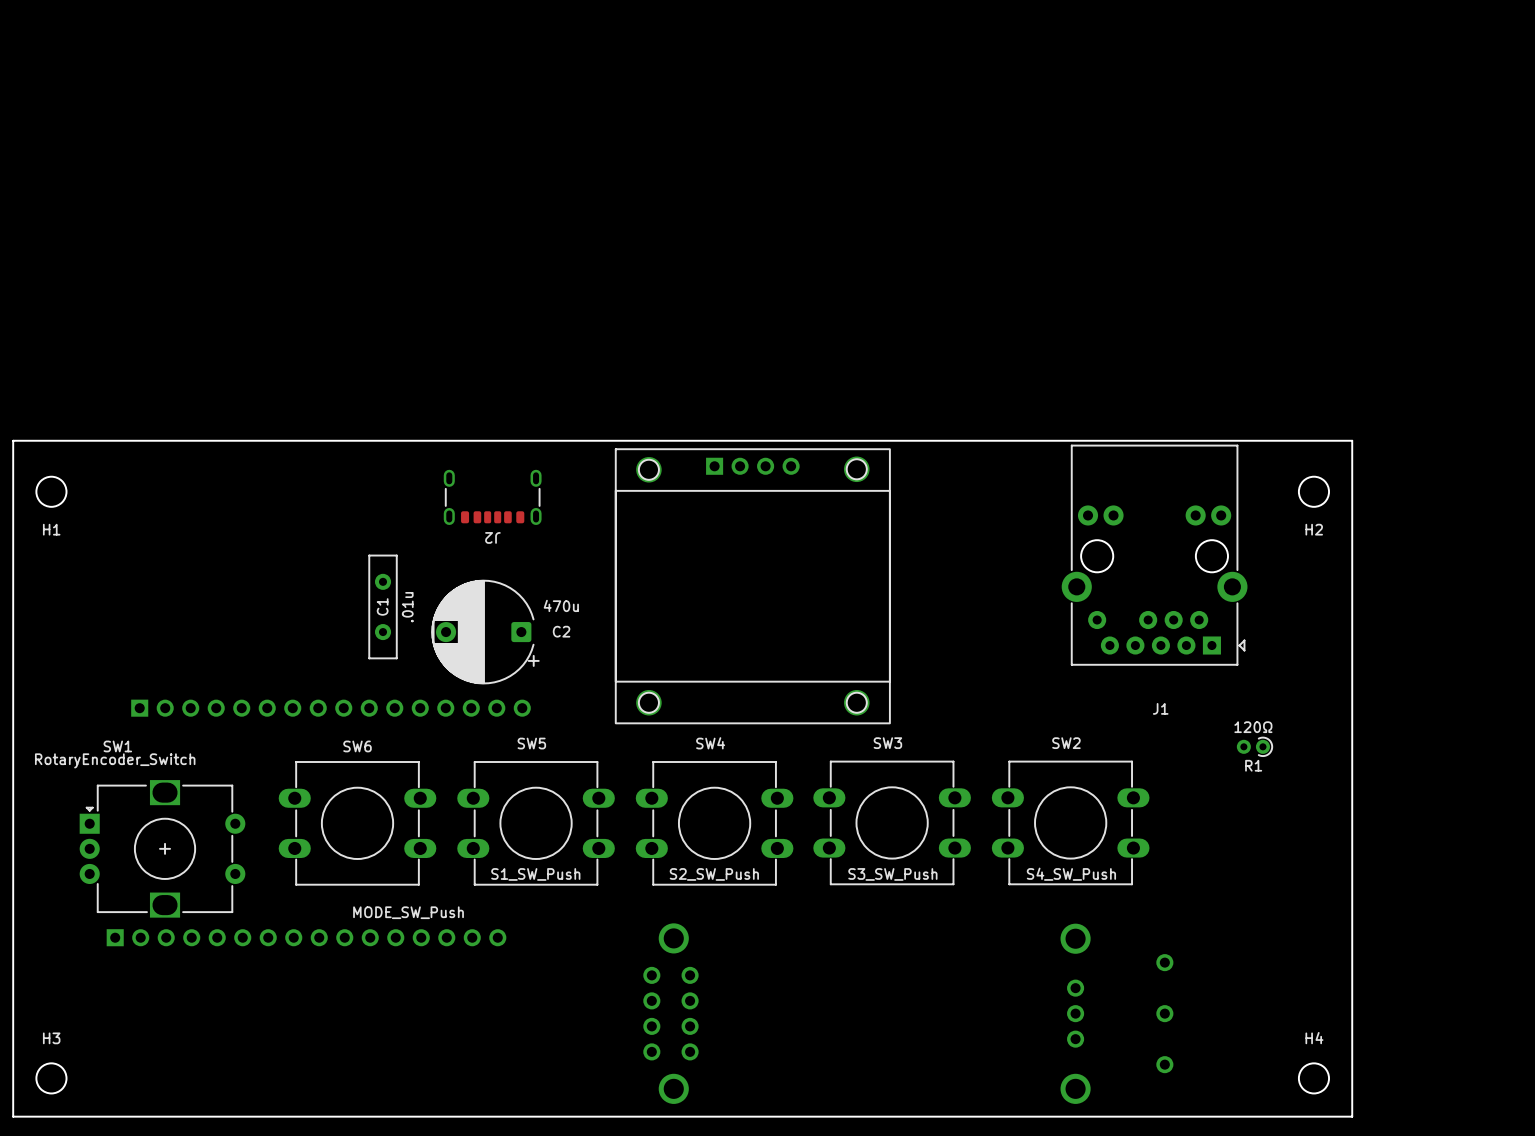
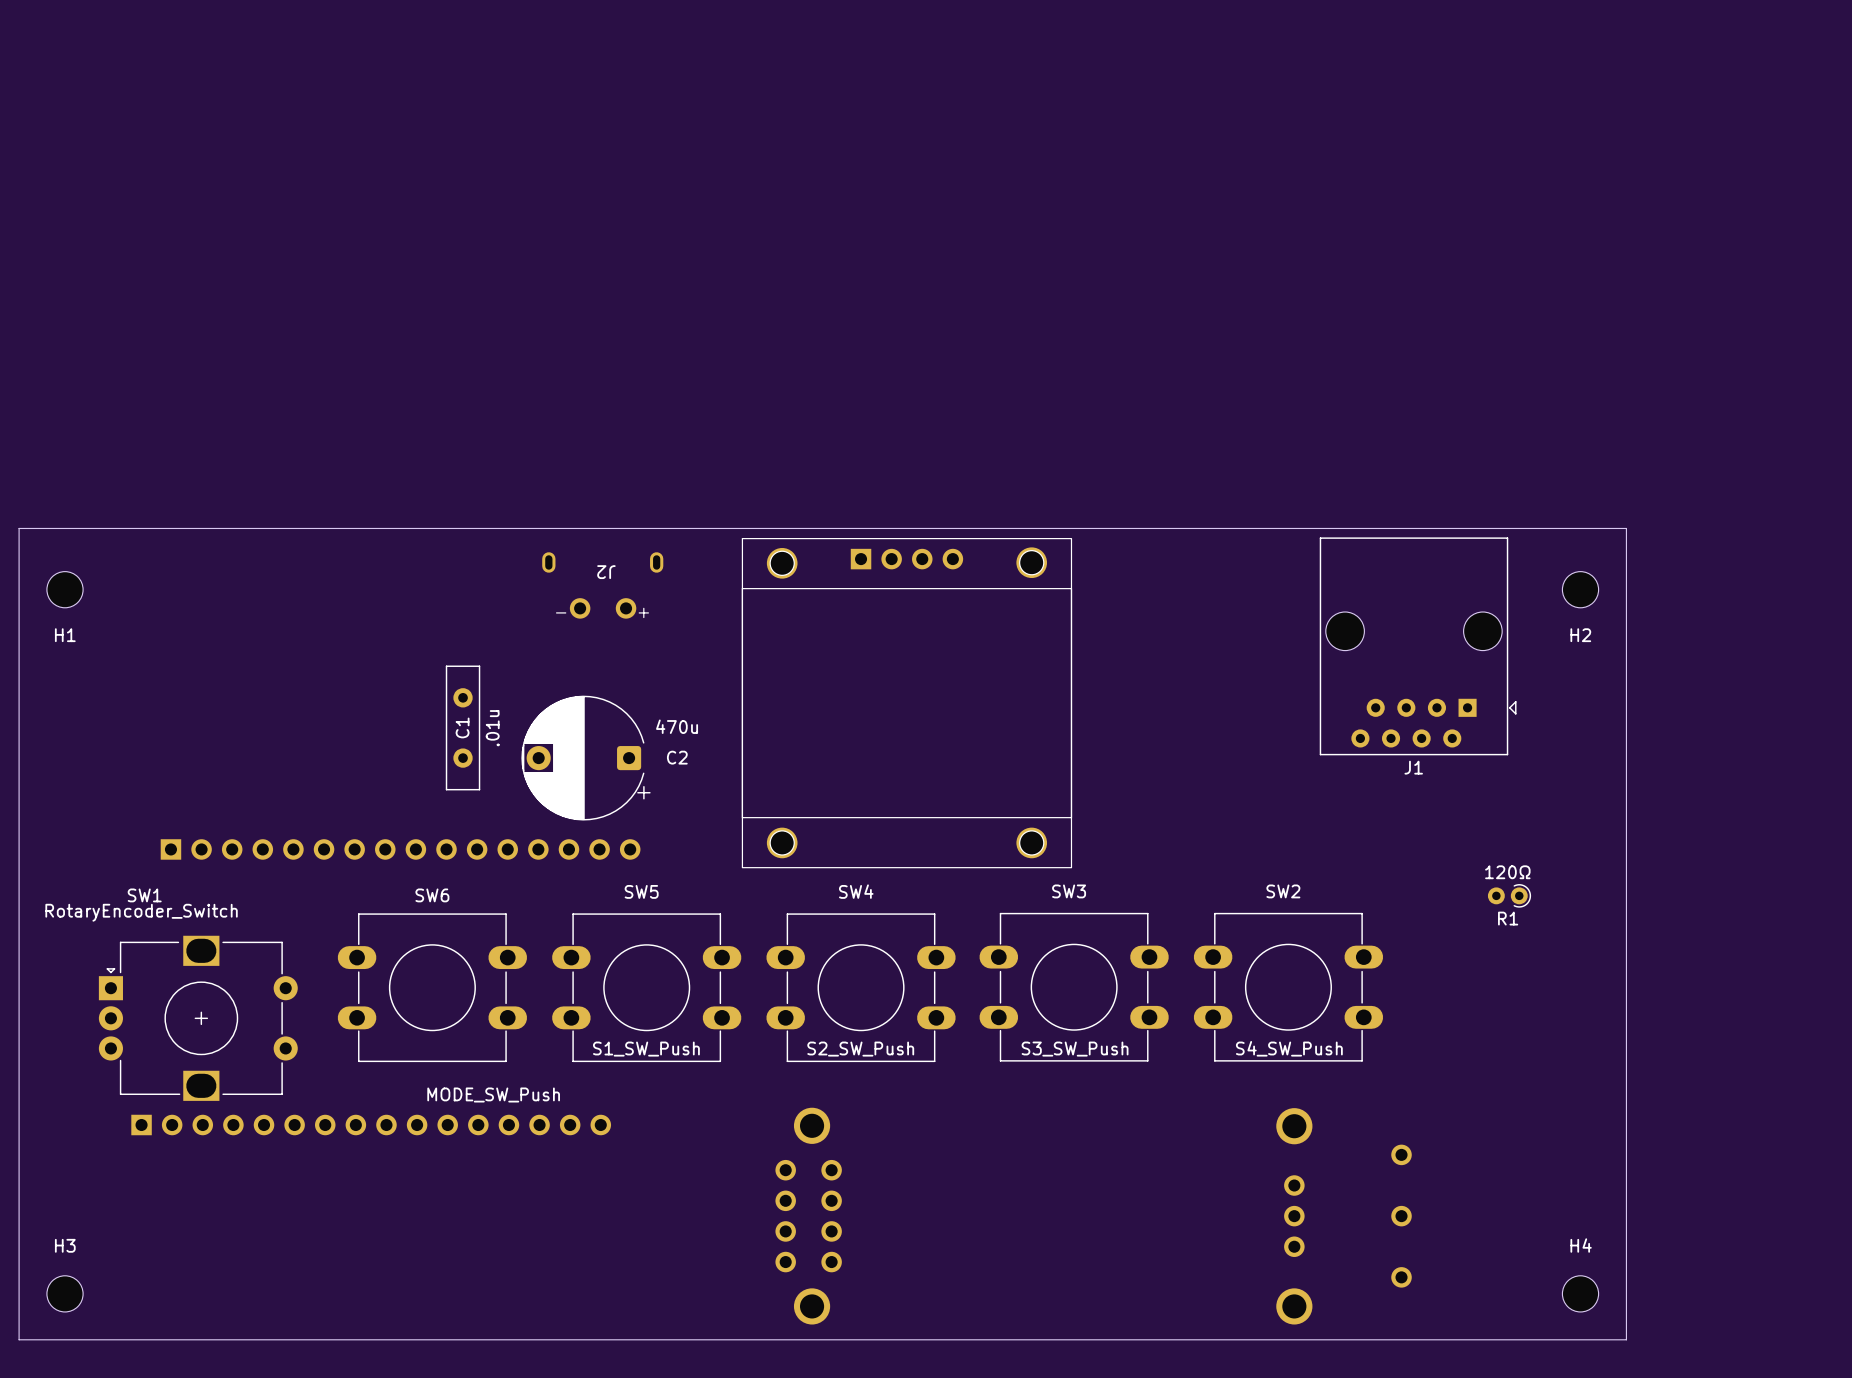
J1 footprint: [1061, 444, 1248, 666] -> [1319, 537, 1517, 756]
J2 footprint: [443, 469, 542, 526] -> [542, 552, 664, 619]
J2 name position: J2 (492, 537) -> J2 (606, 572)
J1 name position: J1 (1160, 708) -> J1 (1413, 767)

